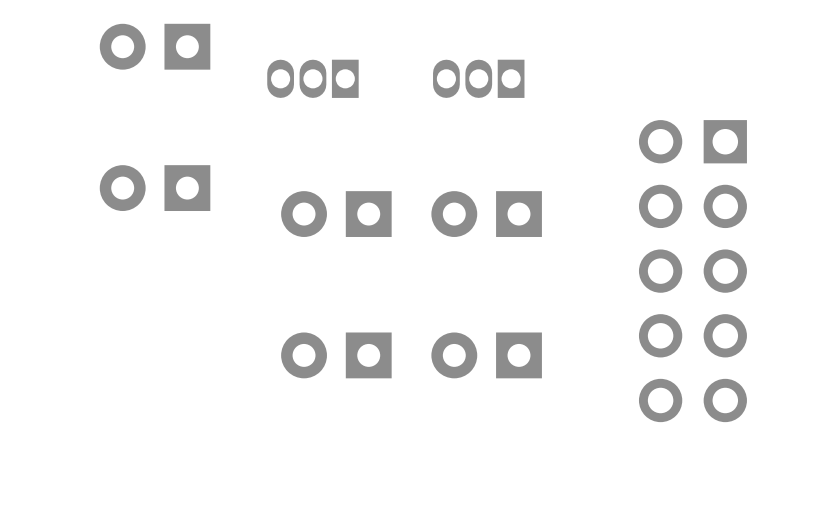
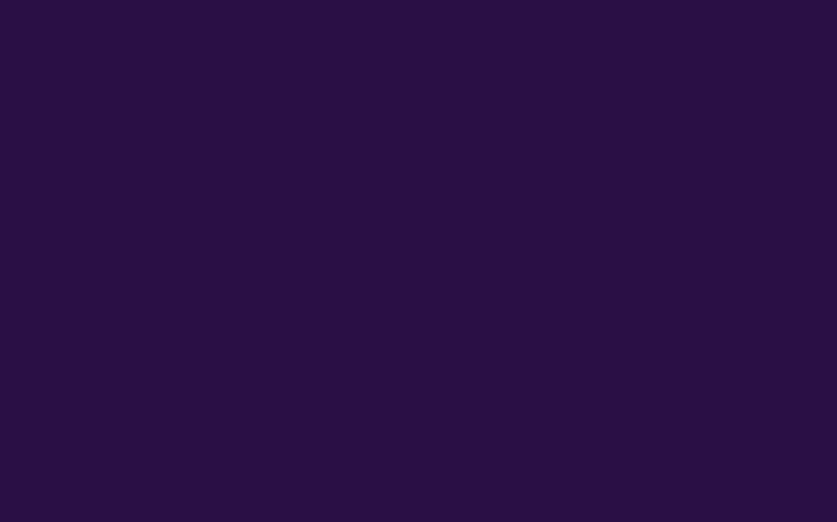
part: (155, 46) -> none
part: (312, 78) -> none
part: (478, 78) -> none
part: (155, 188) -> none
part: (336, 214) -> none
part: (486, 214) -> none
part: (692, 271) -> none
part: (336, 355) -> none
part: (486, 355) -> none

